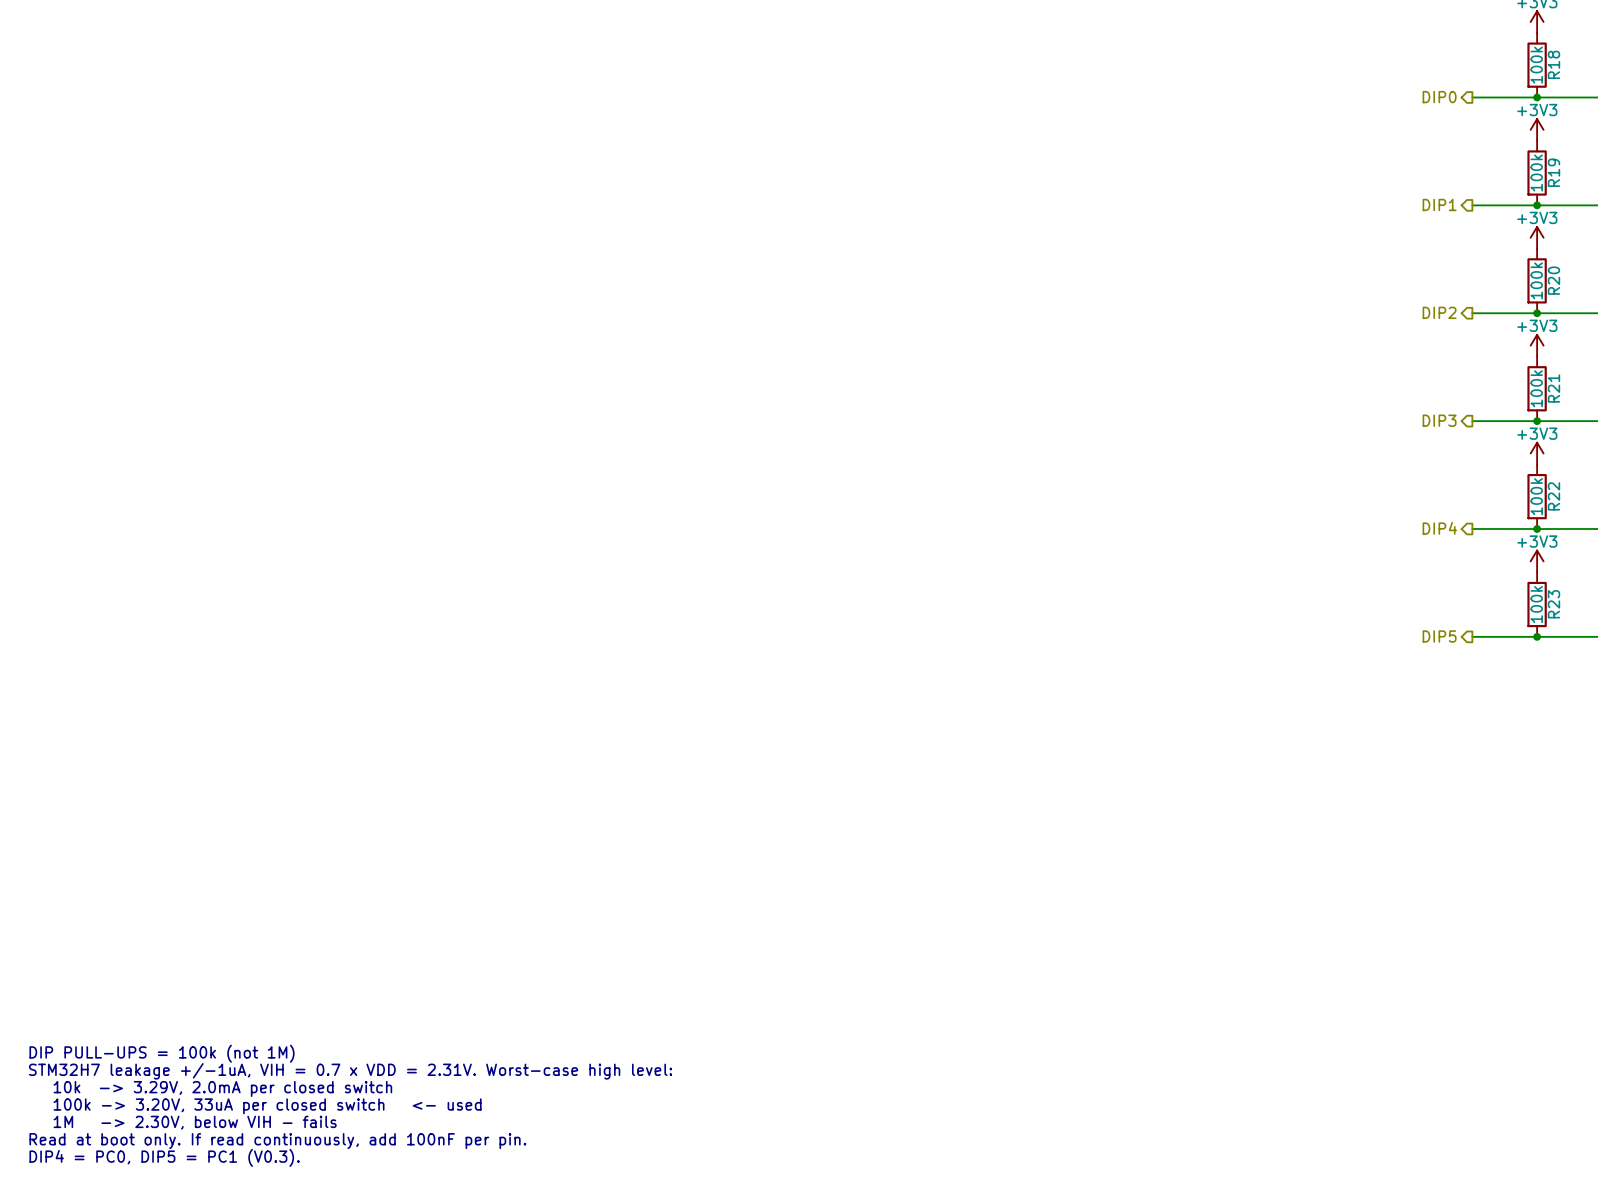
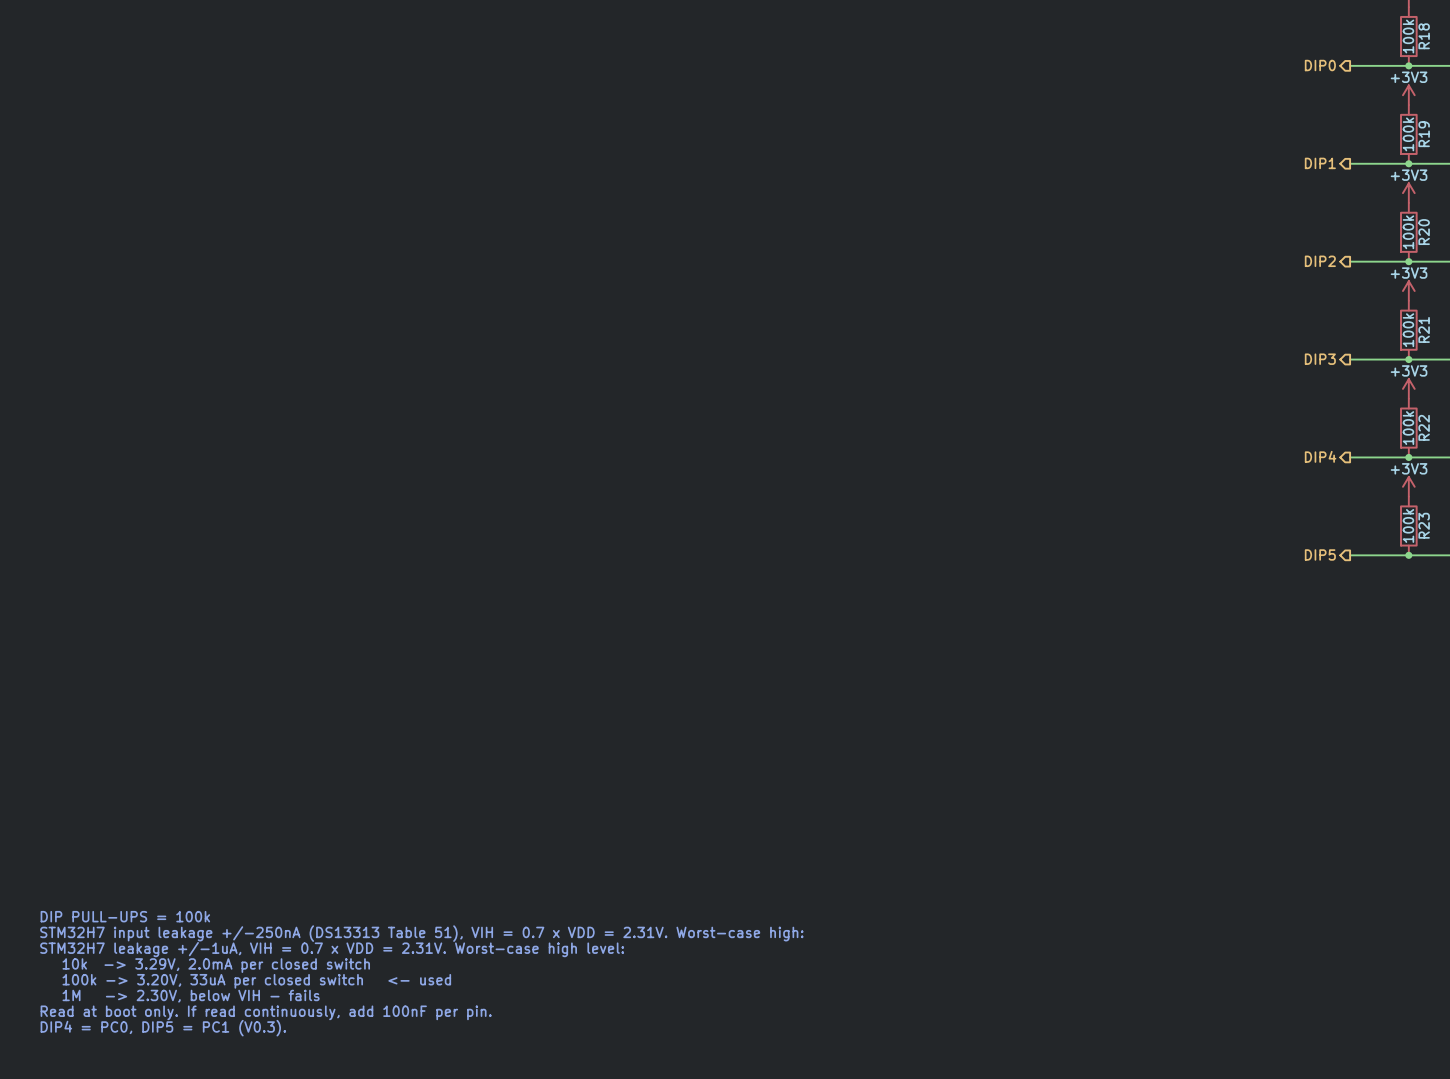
text: none -> DIP PULL-UPS = 100k (125, 916)
text: DIP PULL-UPS = 100k (not 1M) (162, 1053) -> STM32H7 input leakage +/-250nA (DS13313 Table 51), VIH = 0.7 x VDD = 2.31V. Worst-case high: (421, 933)

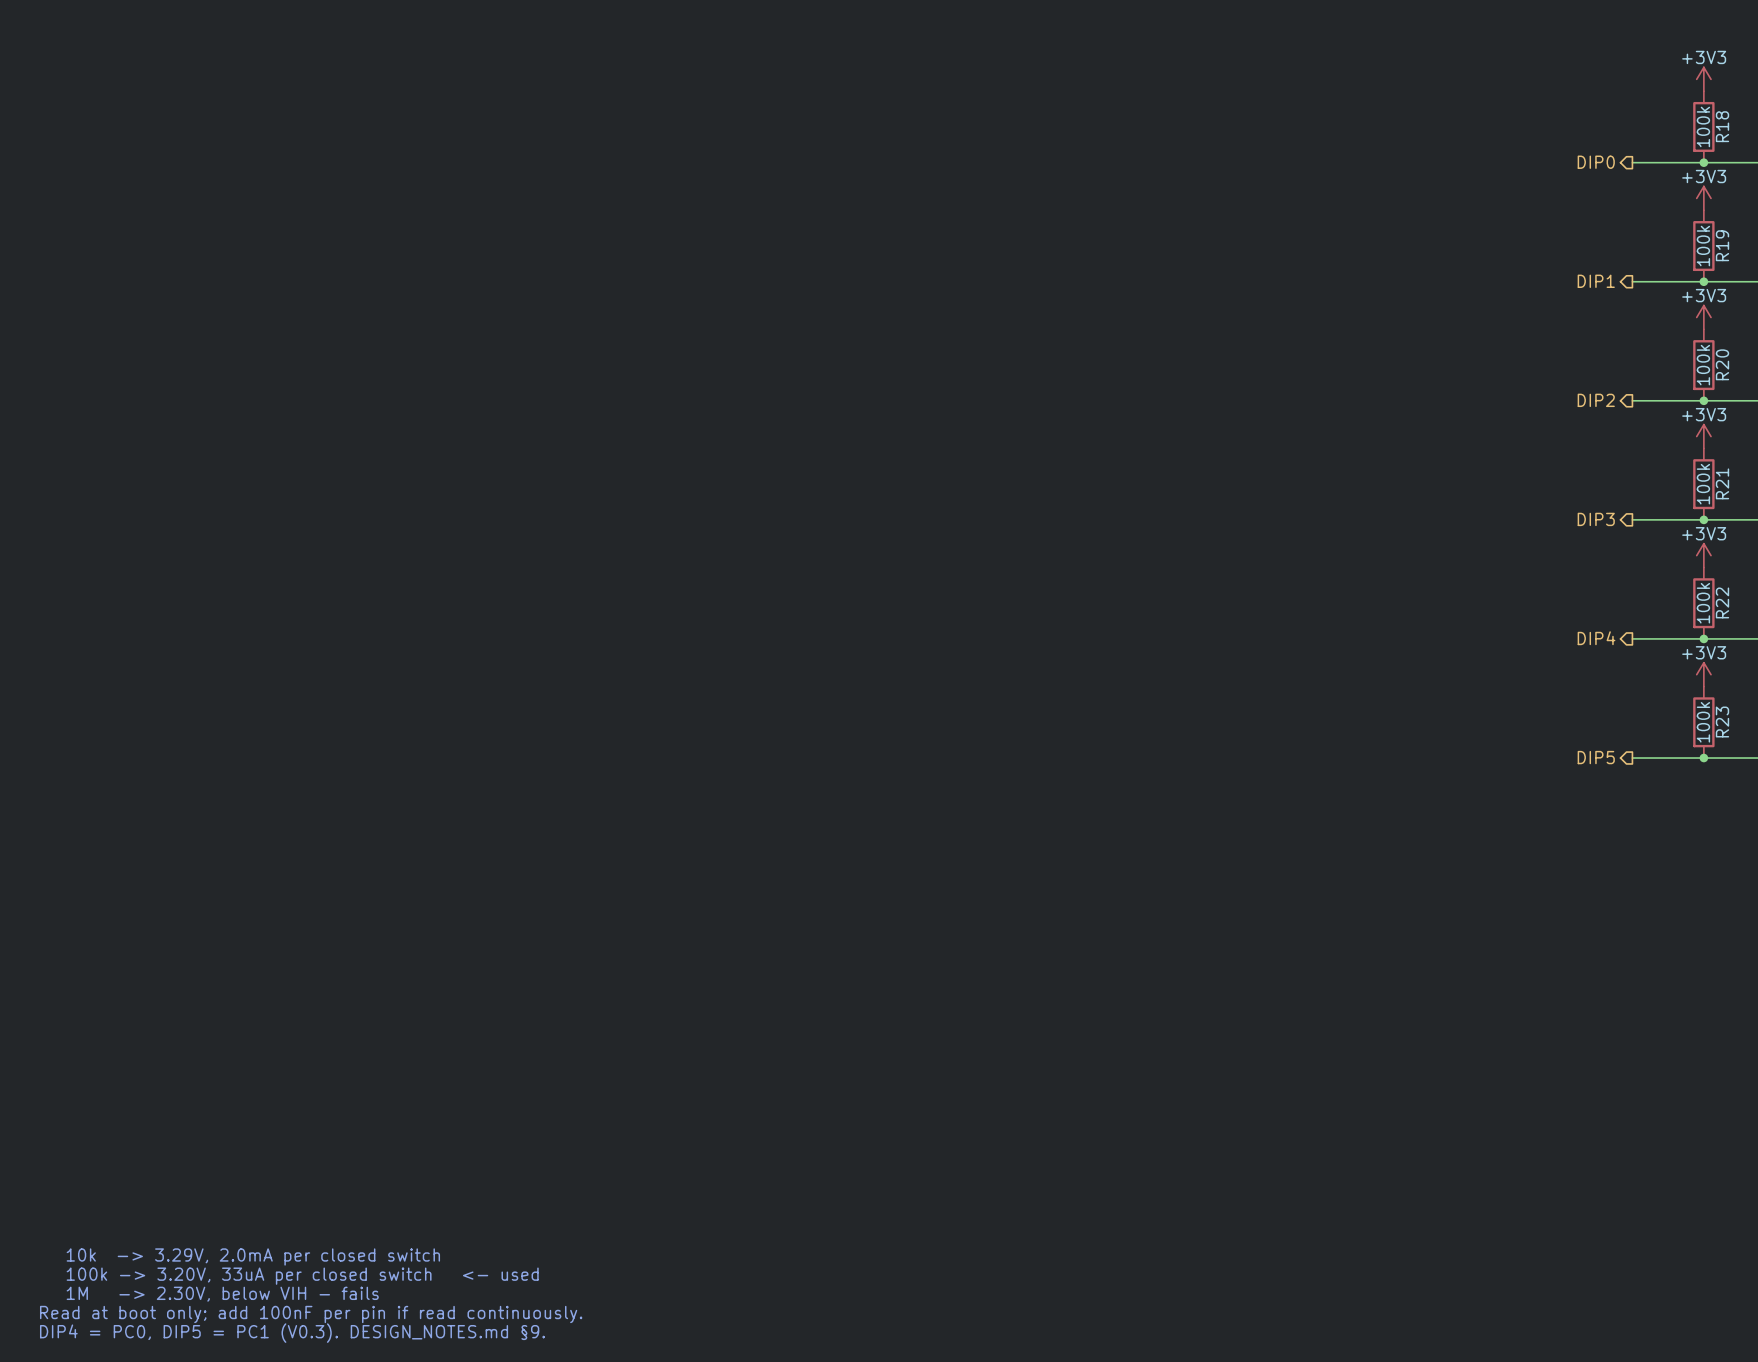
text: DIP PULL-UPS = 100k (125, 916) -> none
text: STM32H7 input leakage +/-250nA (DS13313 Table 51), VIH = 0.7 x VDD = 2.31V. Worst-case high: (421, 933) -> none
text: STM32H7 leakage +/-1uA, VIH = 0.7 x VDD = 2.31V. Worst-case high level: (332, 949) -> none
text: Read at boot only. If read continuously, add 100nF per pin. (266, 1012) -> Read at boot only; add 100nF per pin if read continuously. (311, 1314)
text: DIP4 = PC0, DIP5 = PC1 (V0.3). (163, 1028) -> DIP4 = PC0, DIP5 = PC1 (V0.3). DESIGN_NOTES.md §9. (292, 1333)

